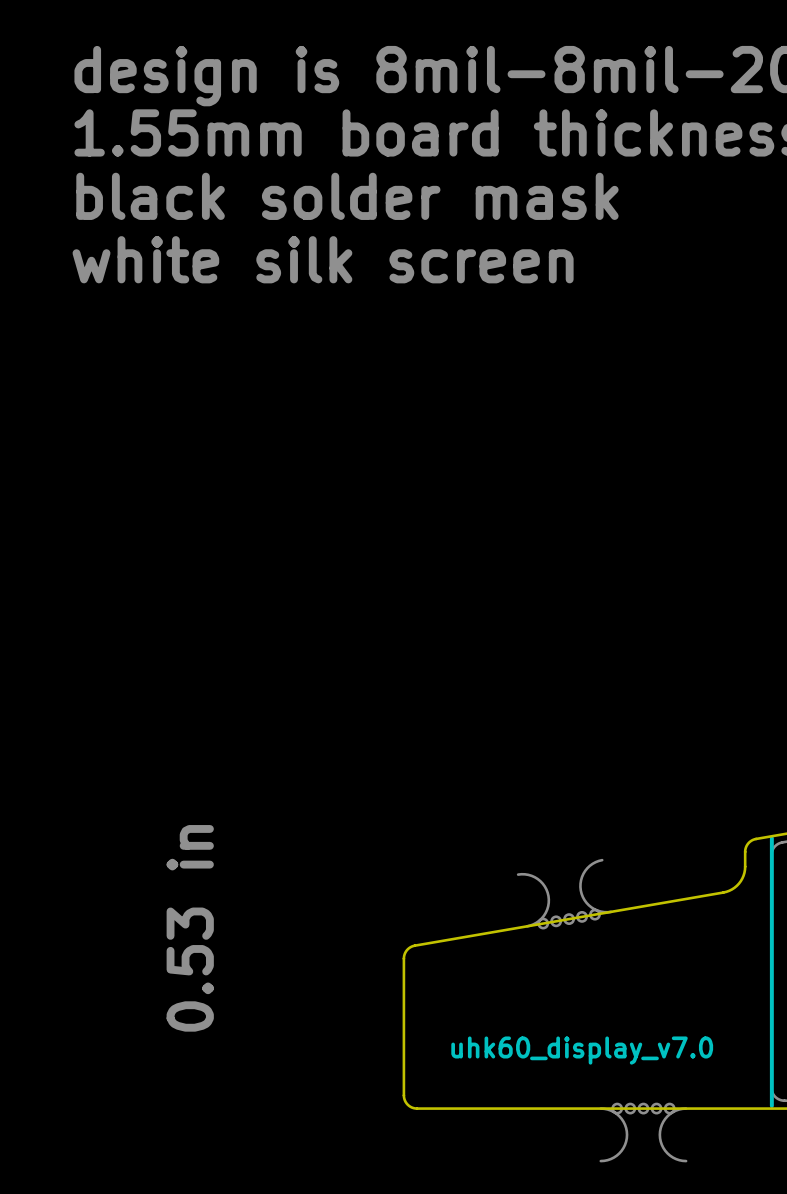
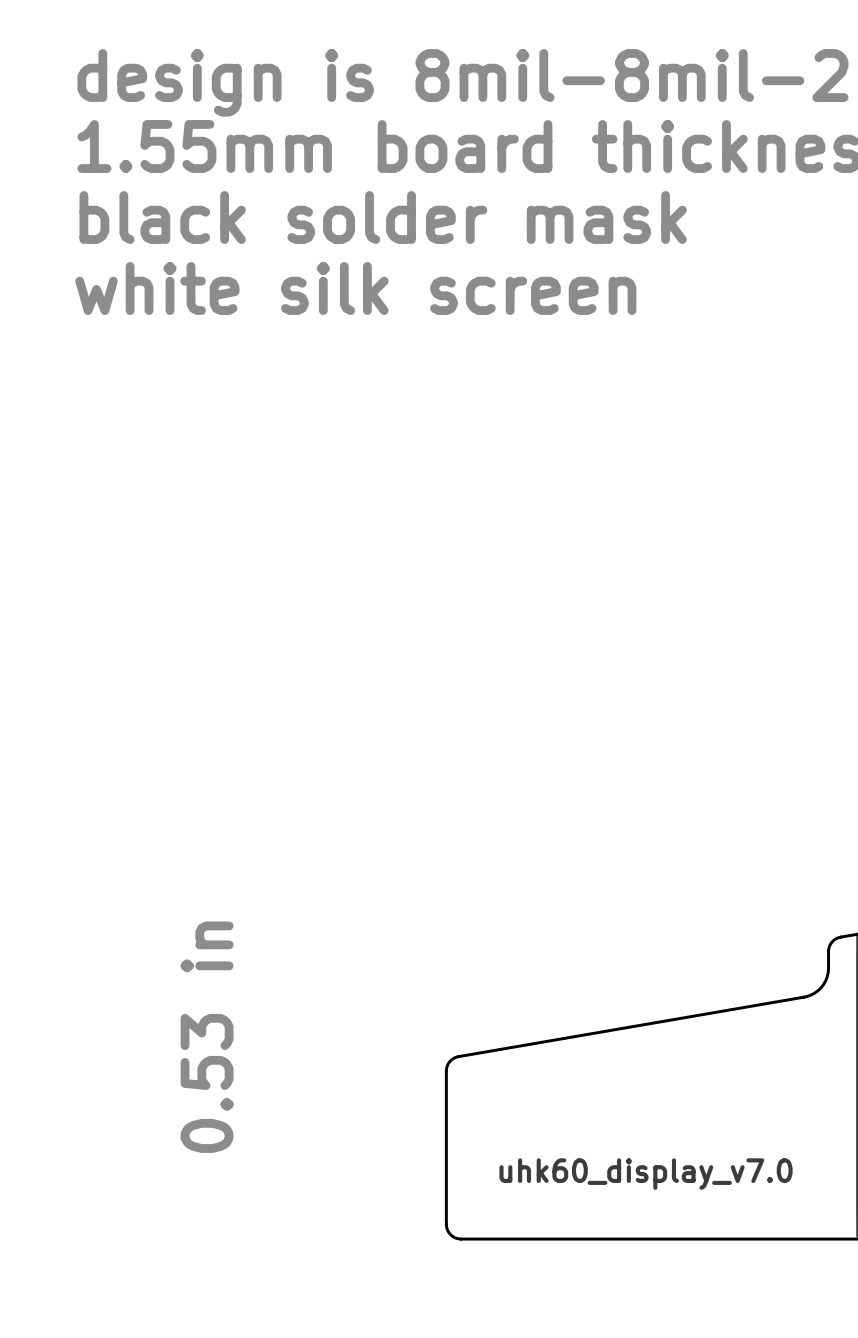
line: (602, 860) (592, 863) (585, 870) (581, 880) (580, 890) (584, 900) (591, 907) (600, 911) (611, 911) -> none
line: (518, 874) (528, 874) (537, 879) (544, 886) (548, 896) (548, 906) (544, 915) (536, 922) (527, 926) -> none
drawing: [537, 908, 601, 930] -> none
drawing: [611, 1102, 676, 1115] -> none
line: (600, 1108) (610, 1110) (619, 1116) (625, 1124) (627, 1134) (625, 1144) (619, 1153) (610, 1159) (600, 1161) -> none
line: (686, 1108) (676, 1110) (667, 1116) (661, 1124) (659, 1134) (661, 1144) (667, 1153) (676, 1159) (686, 1161) -> none

